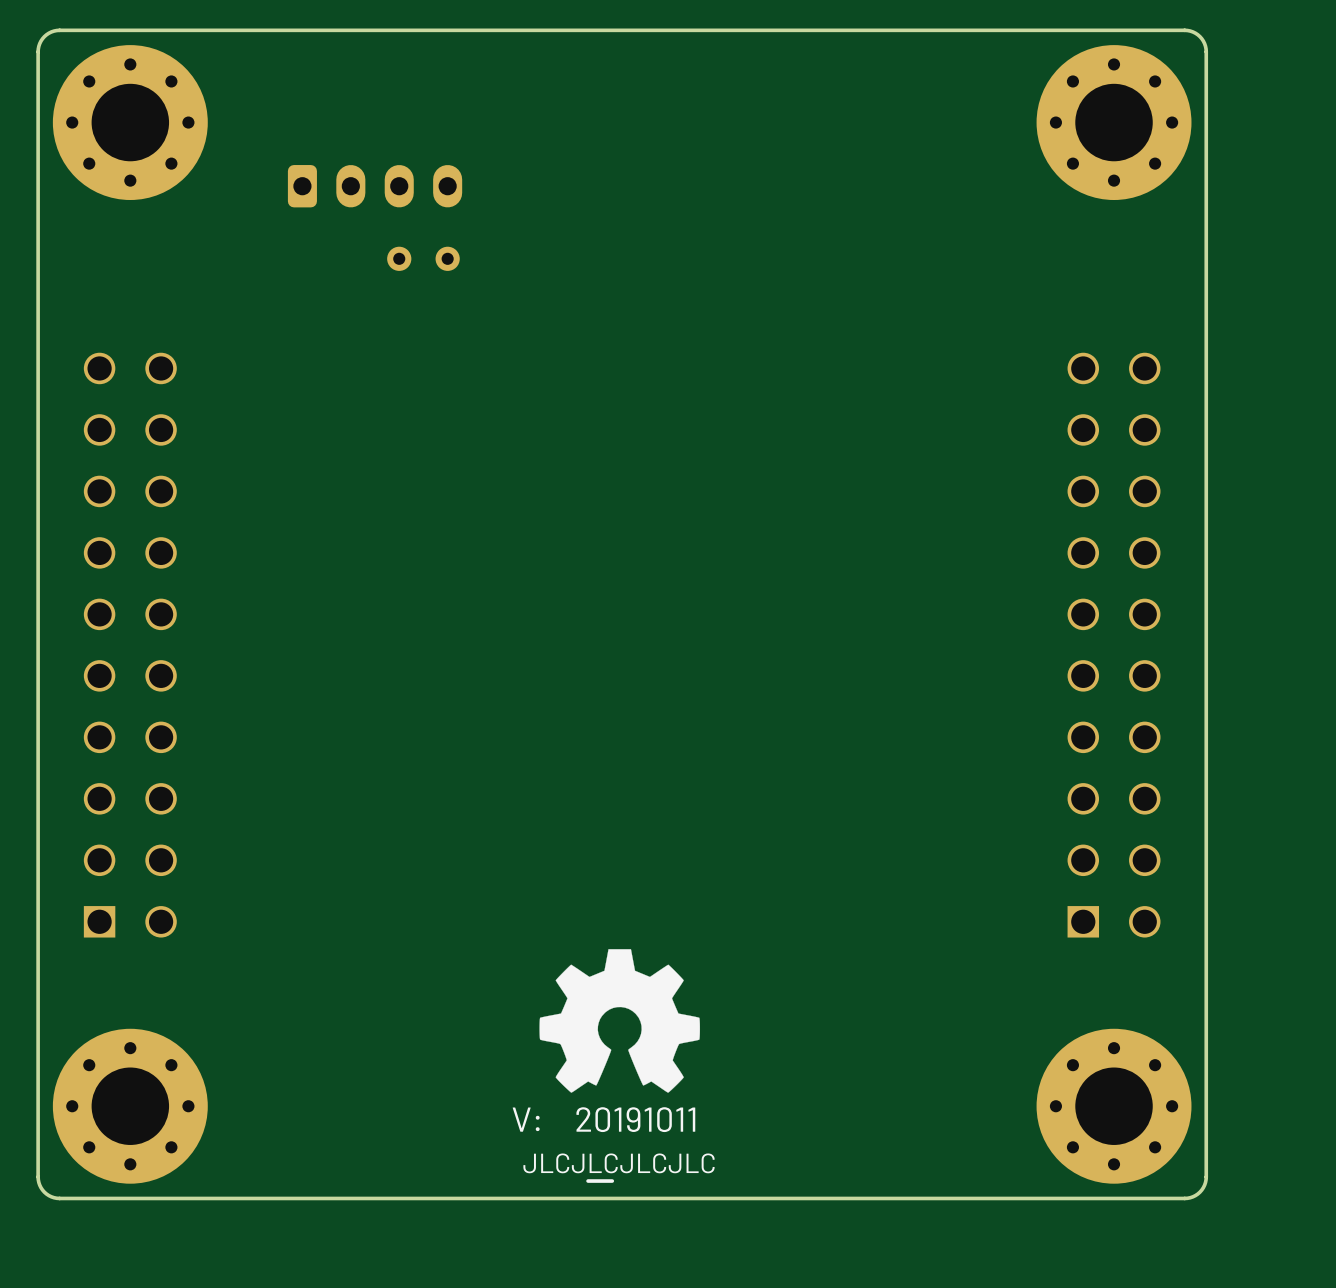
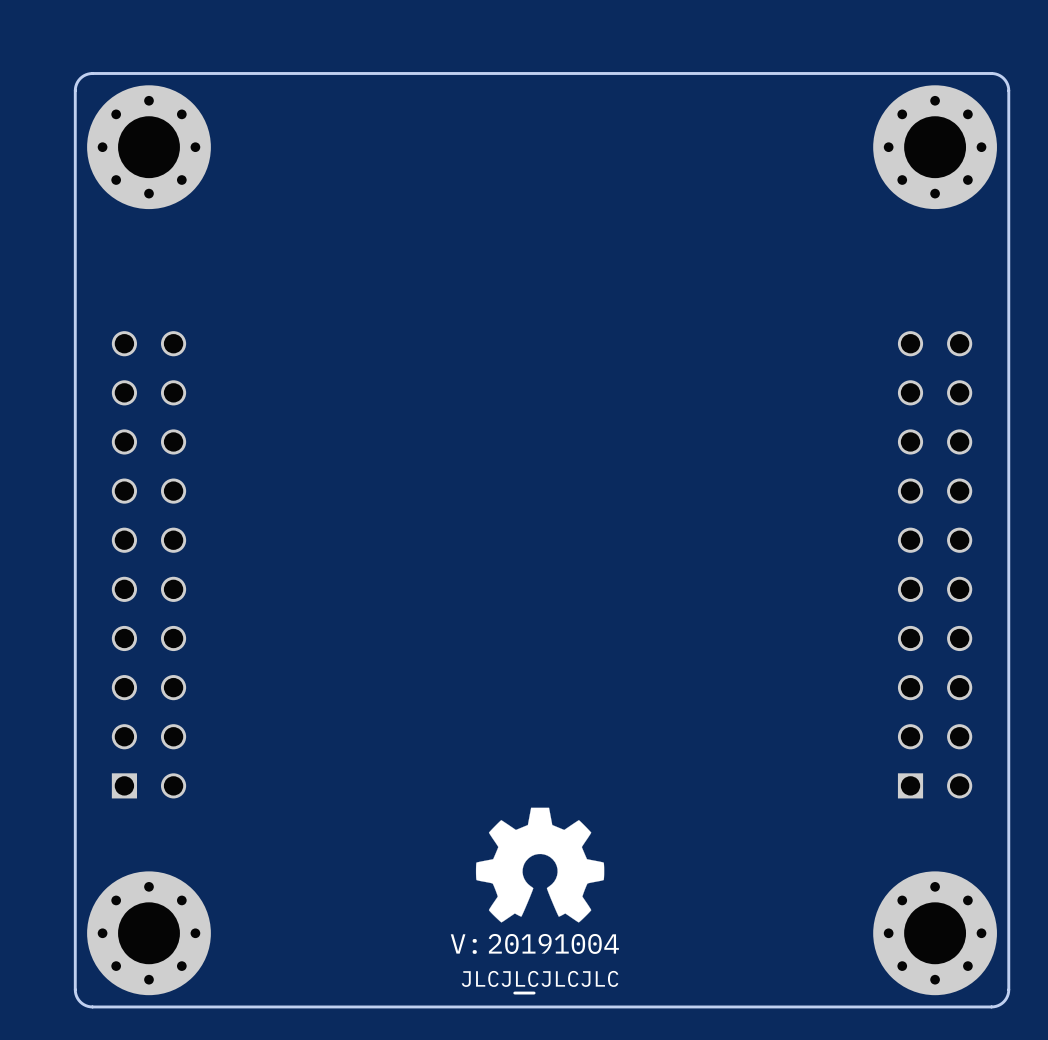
part: (375, 186) -> none
part: (399, 258) -> none
part: (447, 258) -> none
drawing shape: [512, 1107, 696, 1133] -> [450, 933, 619, 954]

